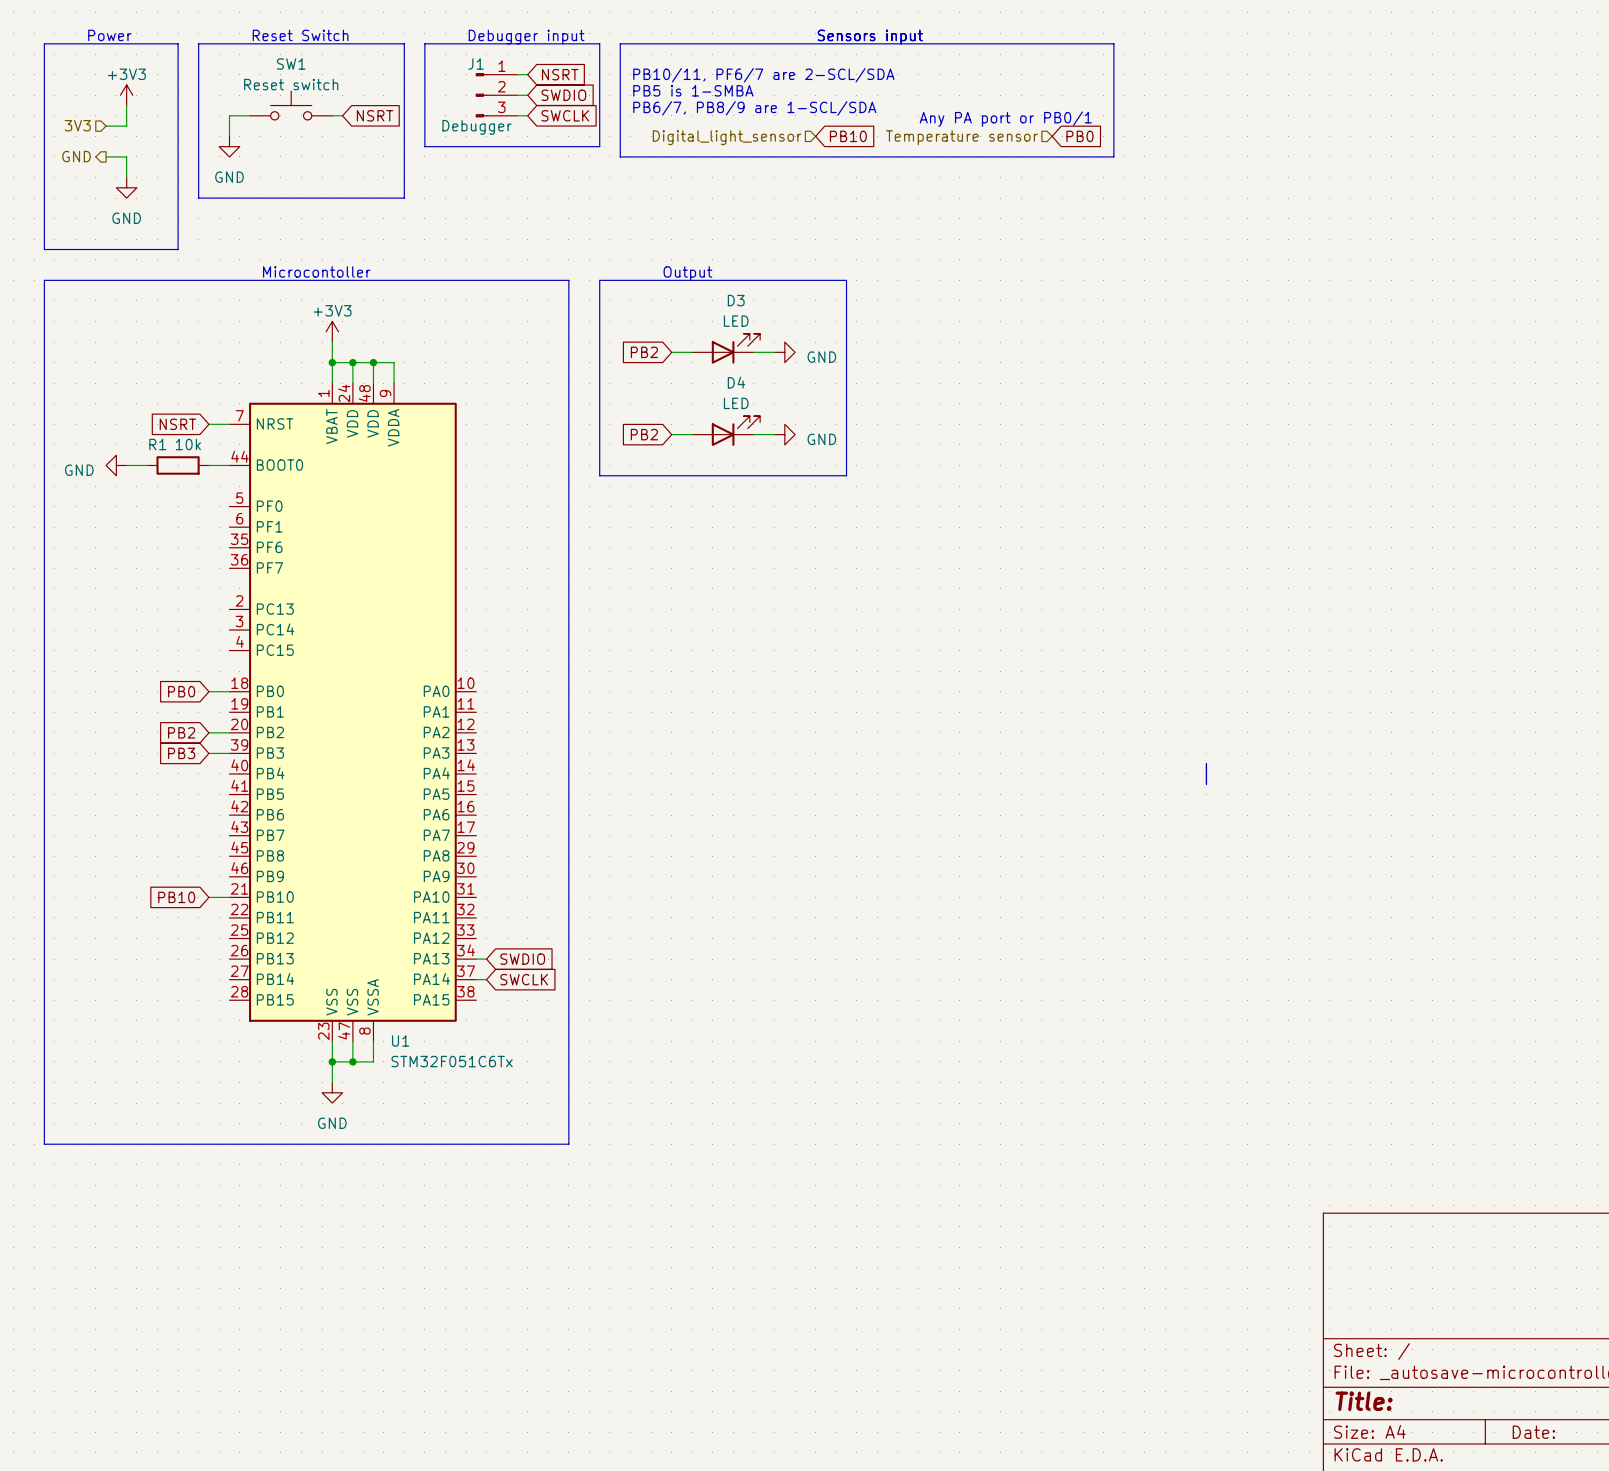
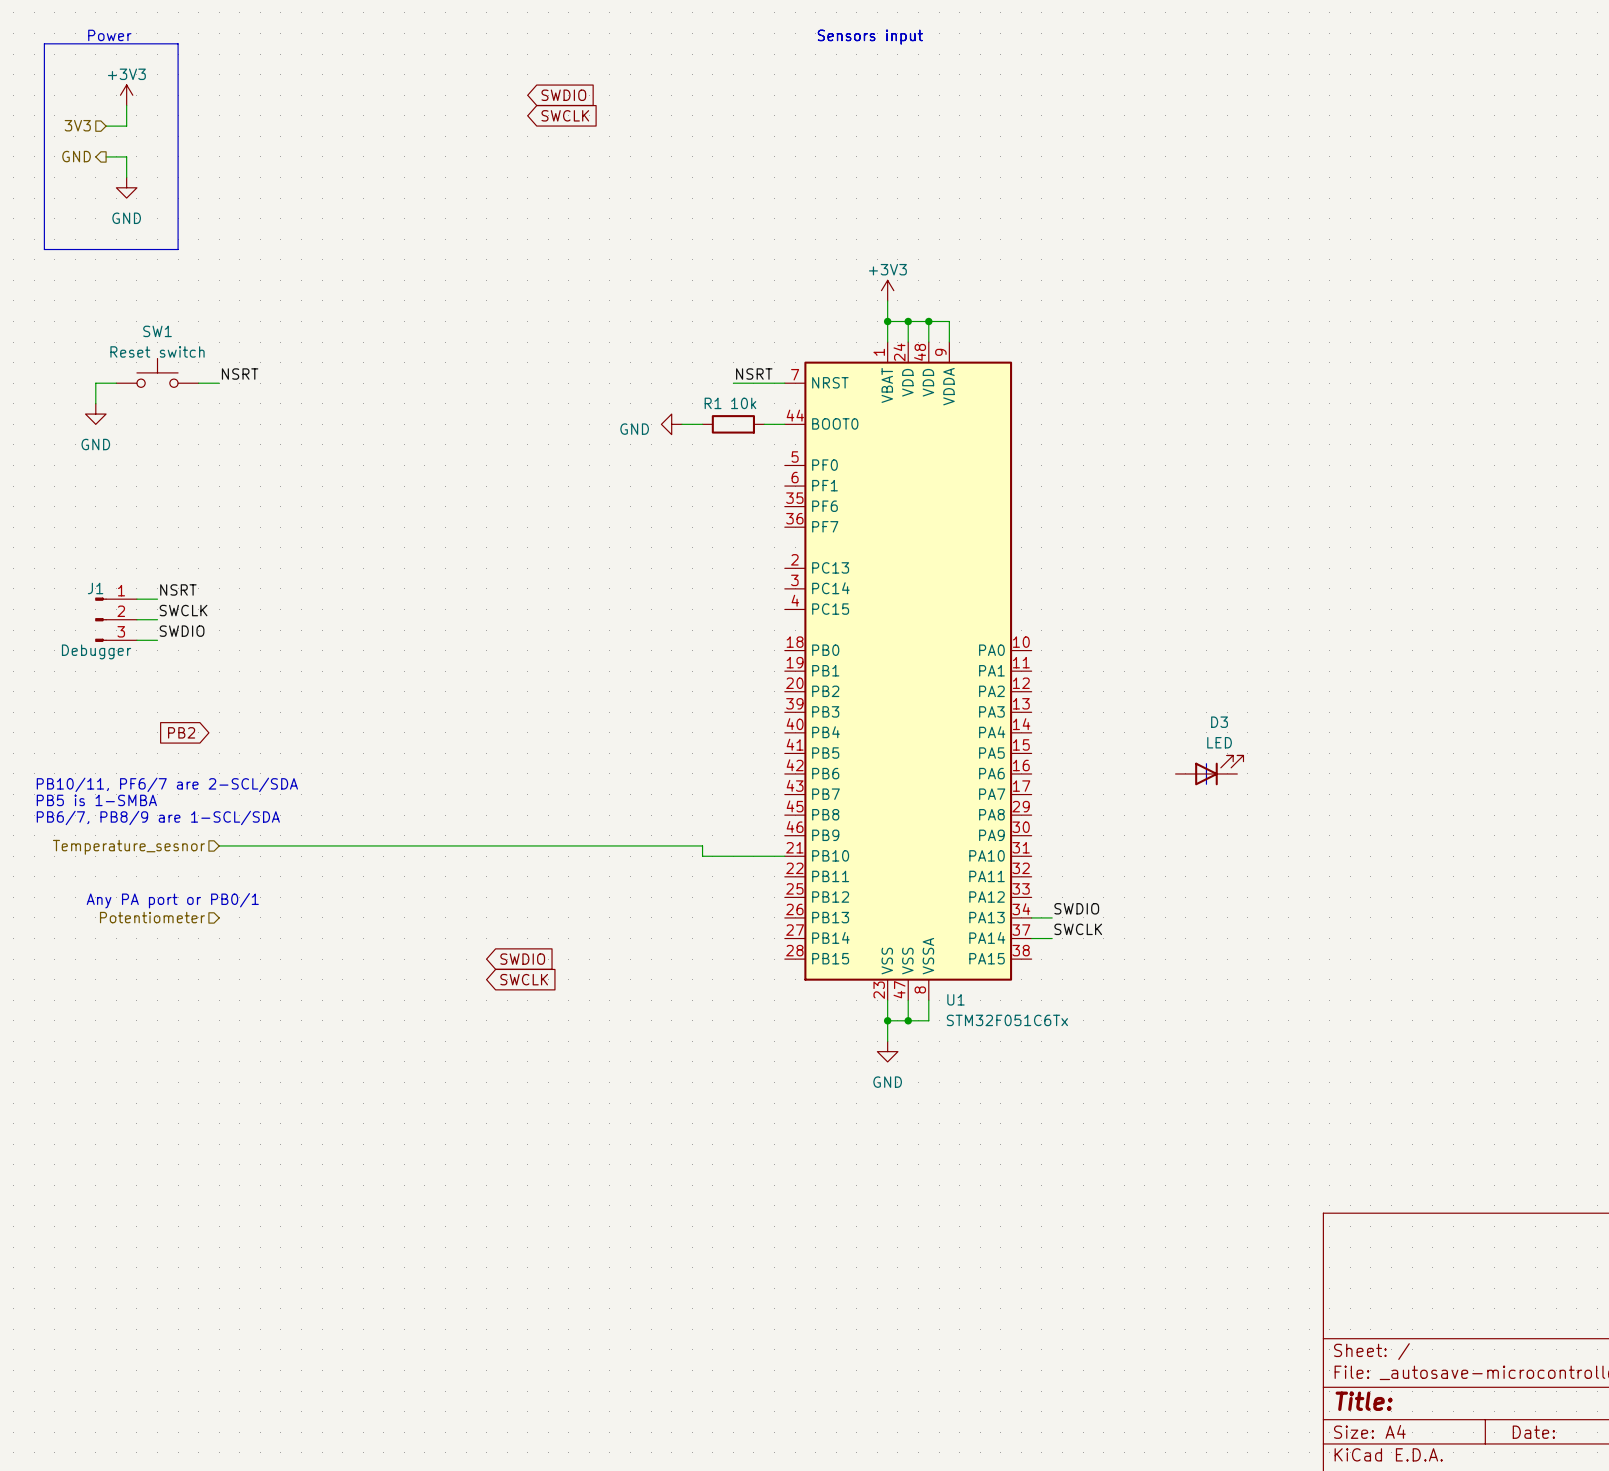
text: Reset Switch (300, 35) -> none
text: Debugger input (526, 37) -> none
line: (198, 43) (404, 43) (404, 198) (198, 198) (198, 43) -> none
line: (424, 43) (599, 43) (599, 146) (424, 146) (424, 43) -> none
line: (620, 43) (1113, 43) (1113, 156) (620, 156) (620, 43) -> none
wire: (517, 74) (527, 74) -> none
global label: NSRT (560, 74) -> none
text: PB10/11, PF6/7 are 2-SCL/SDA (763, 75) -> none
text: PB5 is 1-SMBA (693, 90) -> none
J1 position: (496, 95) -> (116, 619)
wire: (517, 95) (527, 95) -> none
SW1 position: (291, 105) -> (157, 372)
text: PB6/7, PB8/9 are 1-SCL/SDA (754, 108) -> none
wire: (250, 115) (229, 115) (229, 136) -> none
wire: (332, 115) (342, 115) -> none
global label: NSRT (375, 115) -> none
wire: (517, 115) (527, 115) -> none
text: Any PA port or PB0/1 (1005, 119) -> none
global label: PB10 (848, 136) -> none
global label: PB0 (1080, 136) -> none
hierarchical label: Digital_light_sensor (727, 137) -> none
hierarchical label: Temperature sensor (961, 137) -> none
power symbol: GND (229, 146) -> none
text: Microcontoller (316, 271) -> none
text: Output (687, 273) -> none
line: (44, 280) (44, 1144) (568, 1144) (568, 280) (44, 280) -> none
line: (599, 280) (599, 475) (846, 475) (846, 280) (599, 280) -> none
power symbol: none -> +3V3 (887, 290)
wire: none -> (887, 300) (887, 342)
wire: none -> (887, 321) (949, 321) (949, 342)
junction: none -> (887, 321)
wire: none -> (908, 321) (908, 342)
junction: none -> (908, 321)
wire: none -> (928, 321) (928, 342)
junction: none -> (928, 321)
power symbol: +3V3 (332, 331) -> none
wire: (332, 342) (332, 383) -> none
D3 position: (726, 348) -> (1209, 770)
global label: PB2 (644, 352) -> none
wire: (671, 352) (692, 352) -> none
wire: (753, 352) (774, 352) -> none
power symbol: GND (784, 352) -> none
wire: (332, 362) (394, 362) (394, 383) -> none
junction: (332, 362) -> none
wire: (352, 362) (352, 383) -> none
junction: (352, 362) -> none
wire: (373, 362) (373, 383) -> none
junction: (373, 362) -> none
label: none -> NSRT (240, 374)
label: none -> NSRT (754, 374)
wire: none -> (116, 383) (95, 383) (95, 403)
wire: none -> (733, 383) (784, 383)
global label: NSRT (177, 424) -> none
wire: (208, 424) (229, 424) -> (198, 383) (219, 383)
power symbol: none -> GND (671, 424)
D4: LED (726, 431) -> none
global label: PB2 (644, 434) -> none
wire: (671, 434) (692, 434) -> (681, 424) (702, 424)
wire: (753, 434) (774, 434) -> (764, 424) (784, 424)
power symbol: GND (784, 434) -> none
power symbol rotation: 0° (116, 465) -> 90° counterclockwise (95, 414)
power symbol position: GND (116, 465) -> GND (95, 414)
wire: (126, 465) (147, 465) -> none
R1 position: (178, 465) -> (733, 424)
wire: (208, 465) (229, 465) -> none
label: none -> NSRT (178, 589)
label: none -> SWCLK (183, 610)
label: none -> SWDIO (182, 631)
global label: PB0 (181, 691) -> none
wire: (208, 691) (229, 691) -> (136, 599) (157, 599)
U1 position: (352, 712) -> (908, 671)
wire: (208, 732) (229, 732) -> (136, 640) (157, 640)
global label: PB3 (181, 753) -> none
wire: (208, 753) (229, 753) -> (136, 619) (157, 619)
text: none -> PB10/11, PF6/7 are 2-SCL/SDA (167, 784)
text: none -> PB5 is 1-SMBA (96, 800)
text: none -> PB6/7, PB8/9 are 1-SCL/SDA (158, 817)
wire: none -> (219, 845) (702, 845) (702, 856) (784, 856)
hierarchical label: none -> Temperature_sesnor (128, 847)
global label: PB10 (176, 897) -> none
wire: (208, 897) (229, 897) -> none
text: none -> Any PA port or PB0/1 (172, 900)
label: none -> SWDIO (1076, 908)
hierarchical label: none -> Potentiometer (152, 917)
wire: none -> (1031, 917) (1052, 917)
label: none -> SWCLK (1078, 929)
wire: none -> (1031, 938) (1052, 938)
wire: (476, 959) (486, 959) -> none
wire: (476, 979) (486, 979) -> none
wire: none -> (887, 1000) (887, 1041)
wire: none -> (908, 1000) (908, 1020)
wire: none -> (928, 1000) (928, 1020) (887, 1020)
junction: none -> (887, 1020)
junction: none -> (908, 1020)
wire: (332, 1041) (332, 1082) -> none
wire: (352, 1041) (352, 1061) -> none
wire: (373, 1041) (373, 1061) (332, 1061) -> none
power symbol: none -> GND (887, 1051)
junction: (332, 1061) -> none
junction: (352, 1061) -> none
power symbol: GND (332, 1092) -> none

